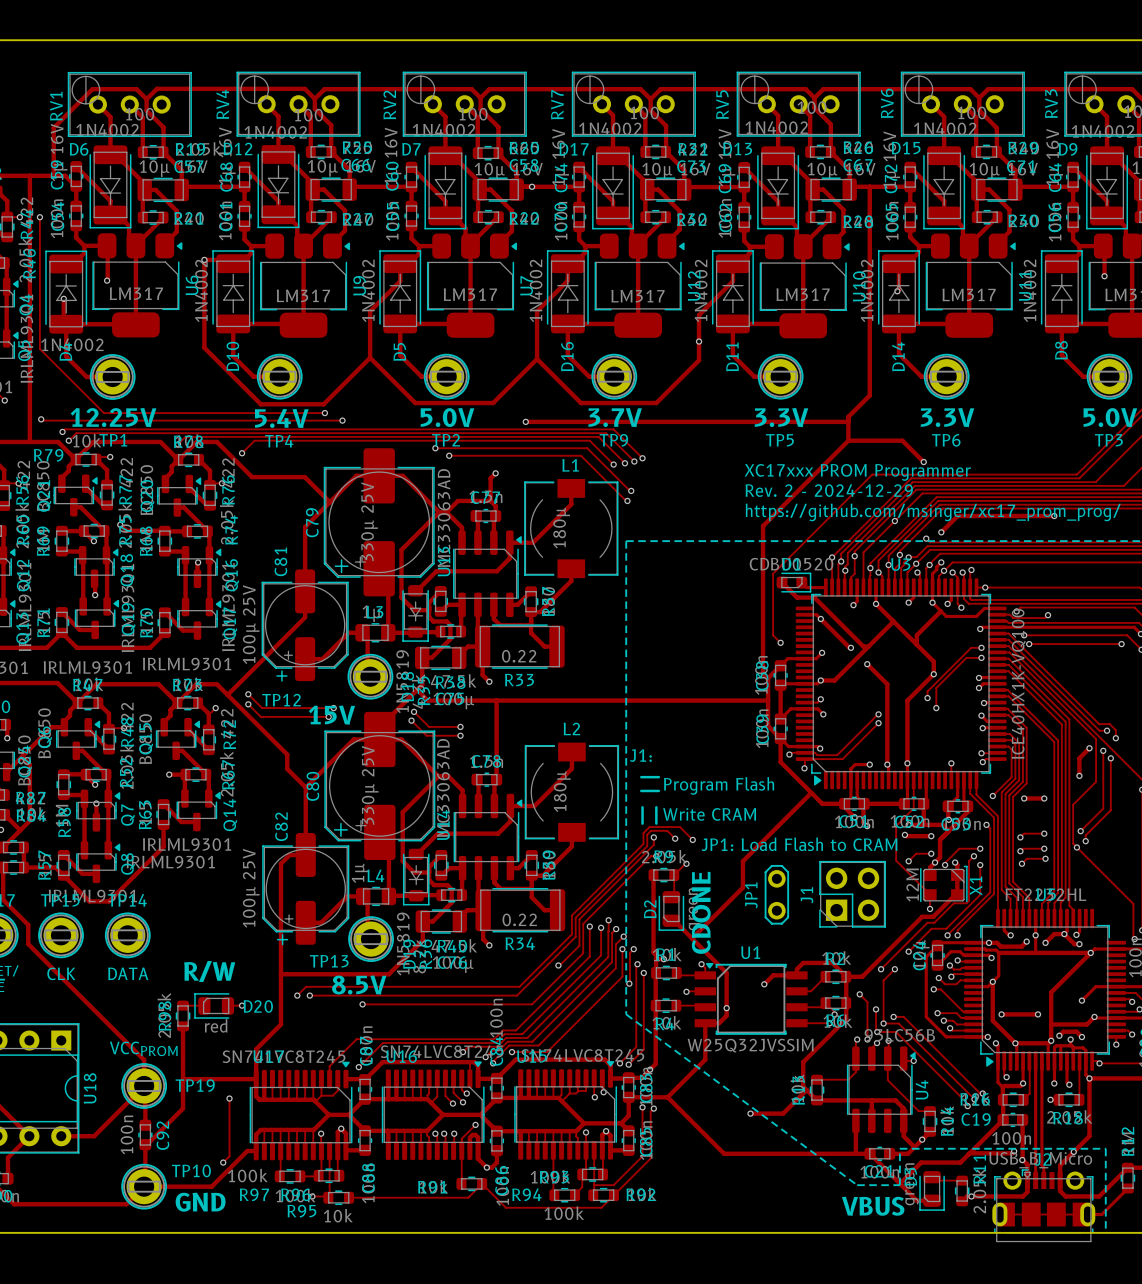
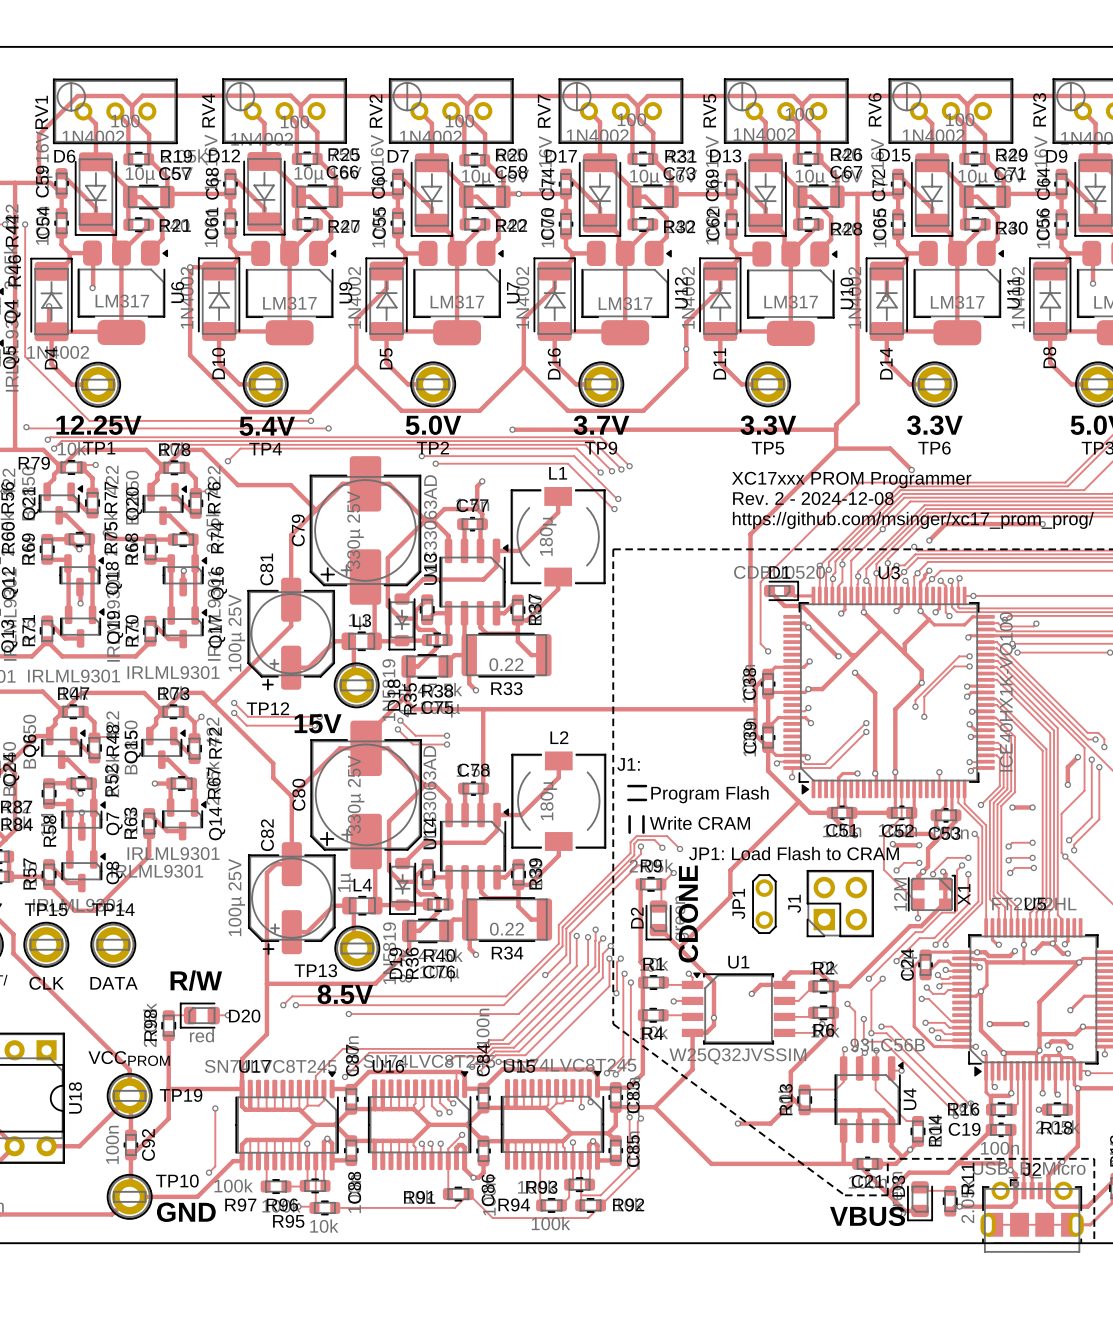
text: Rev. 2 - 2024-12-29 (829, 490) -> Rev. 2 - 2024-12-08 (813, 498)

